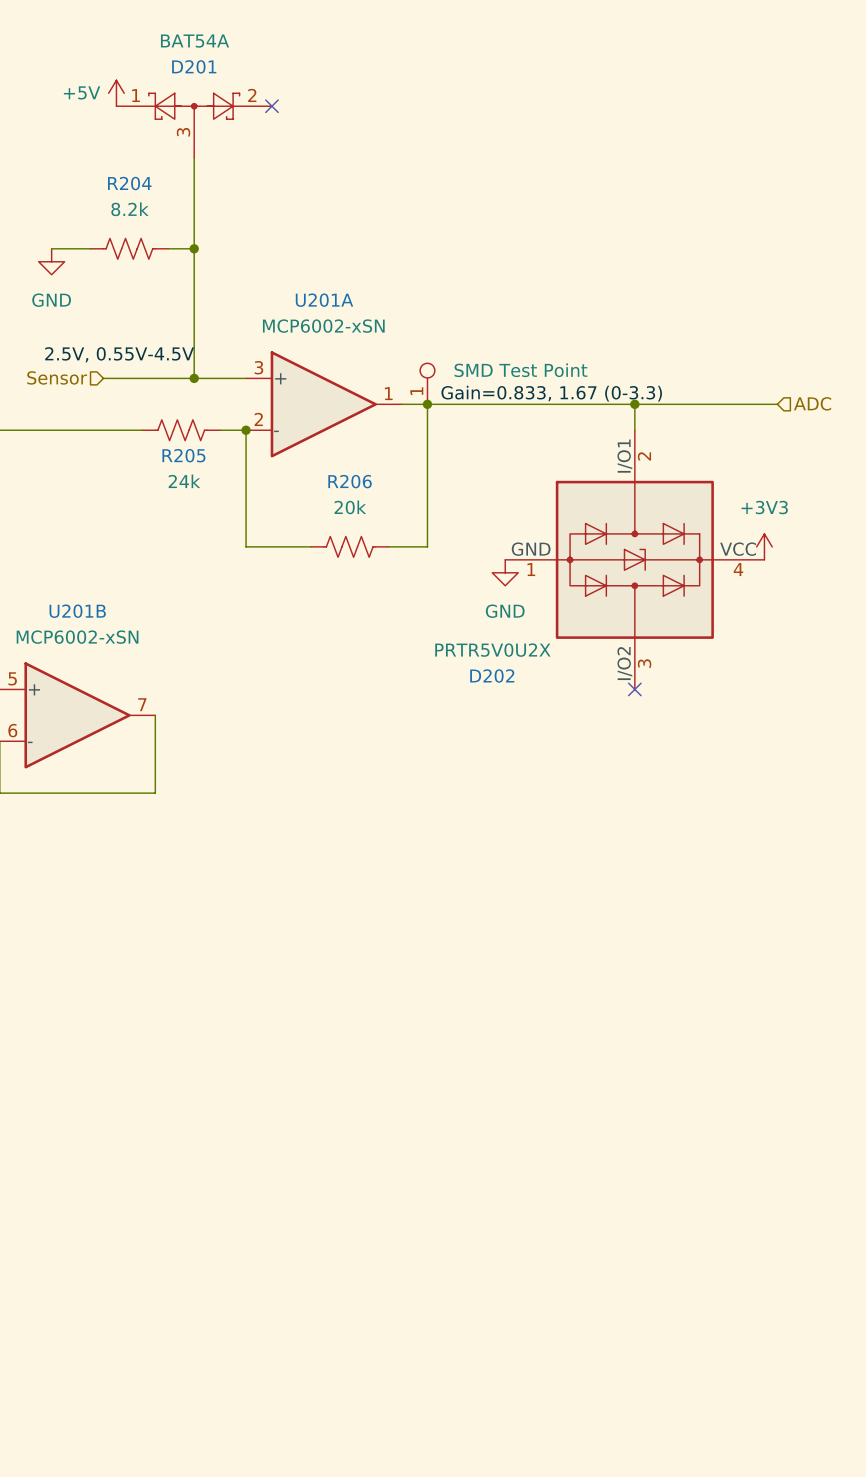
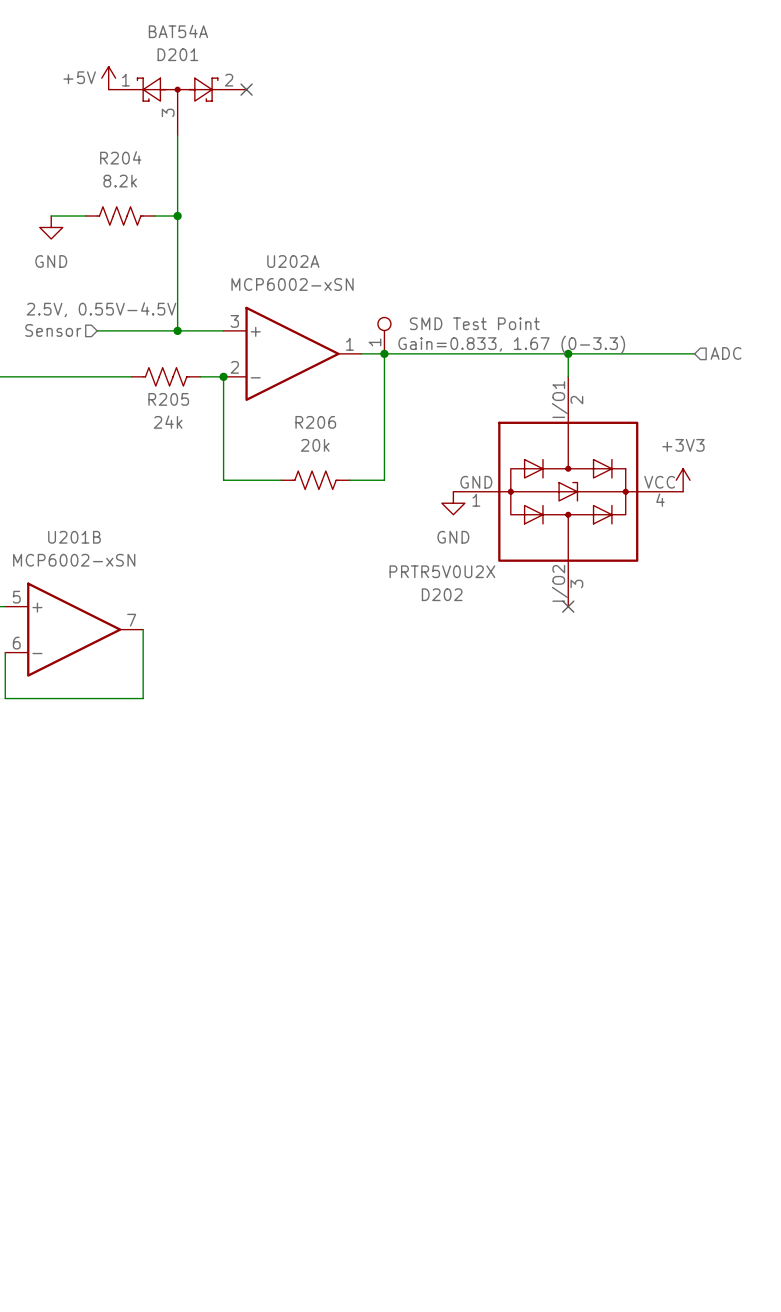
U201A name: U201A (324, 300) -> U202A (293, 261)

